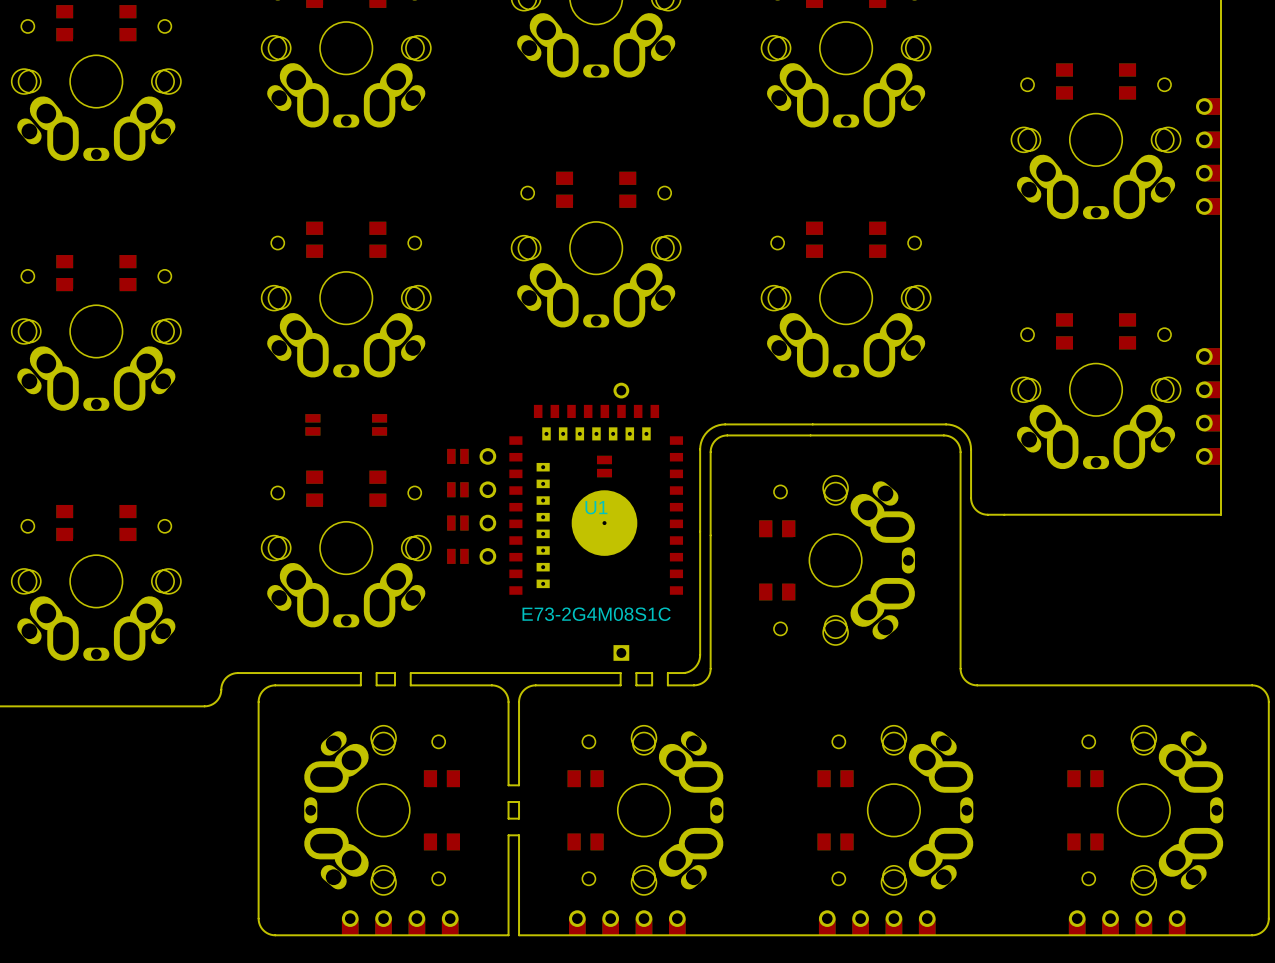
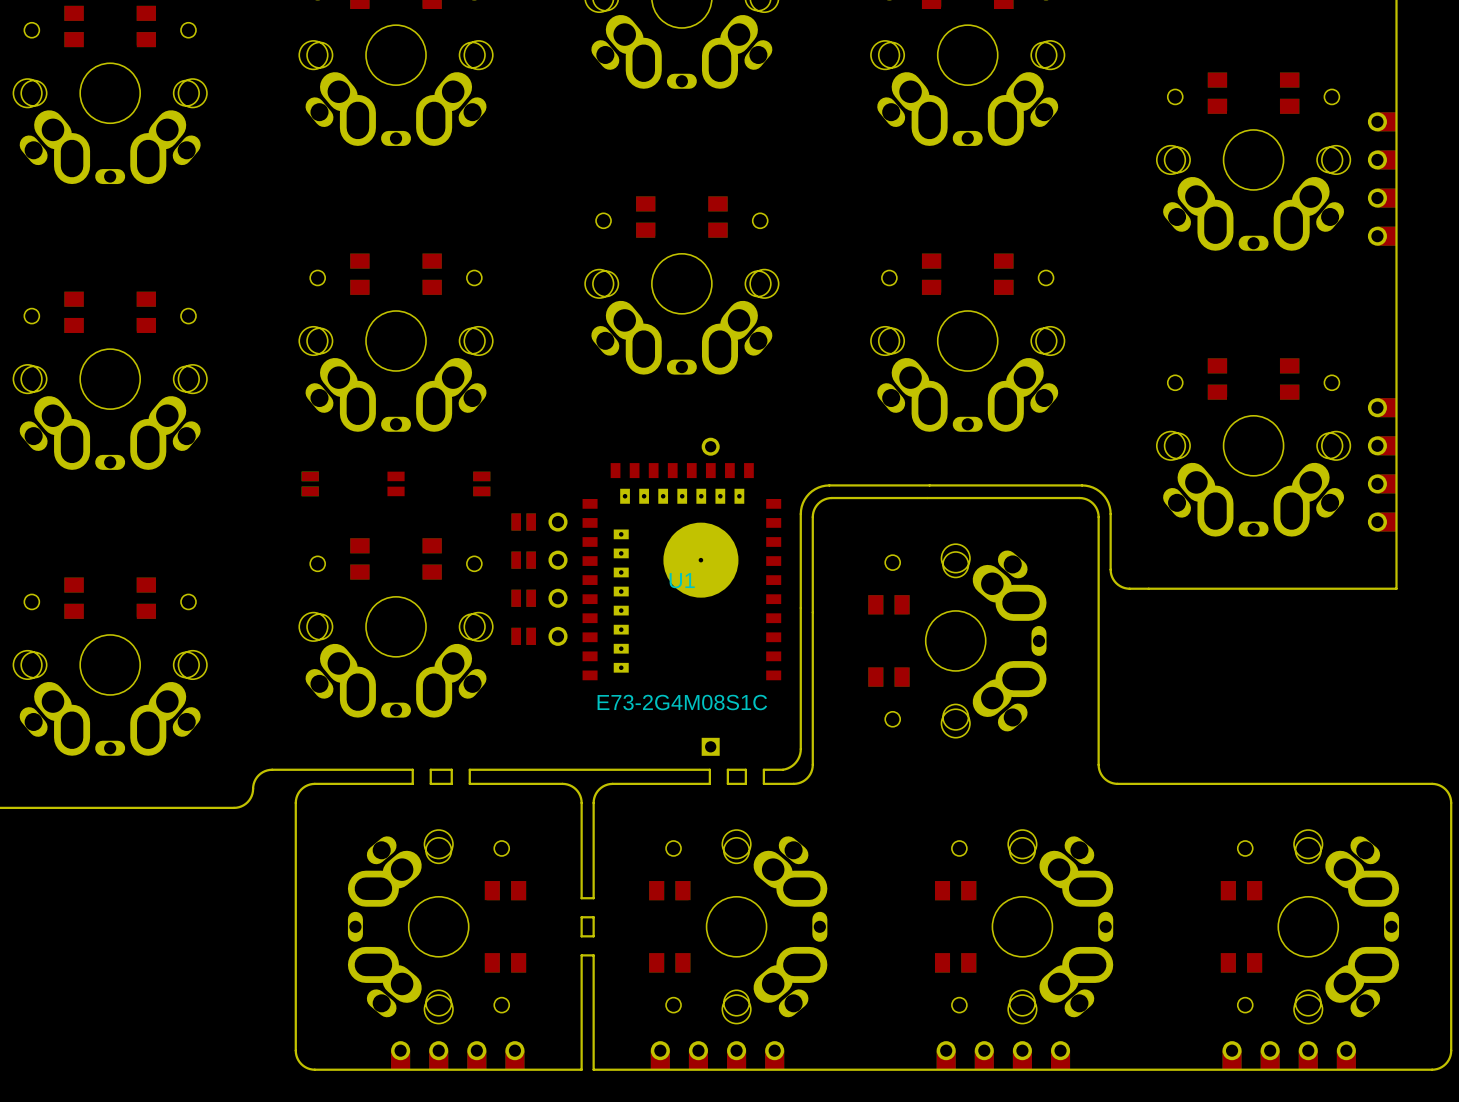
part: none -> (310, 483)
part: none -> (396, 483)
part: none -> (481, 483)
part: (312, 424) -> none
part: (379, 424) -> none
part: (604, 466) -> none
part position: (604, 523) -> (700, 560)

